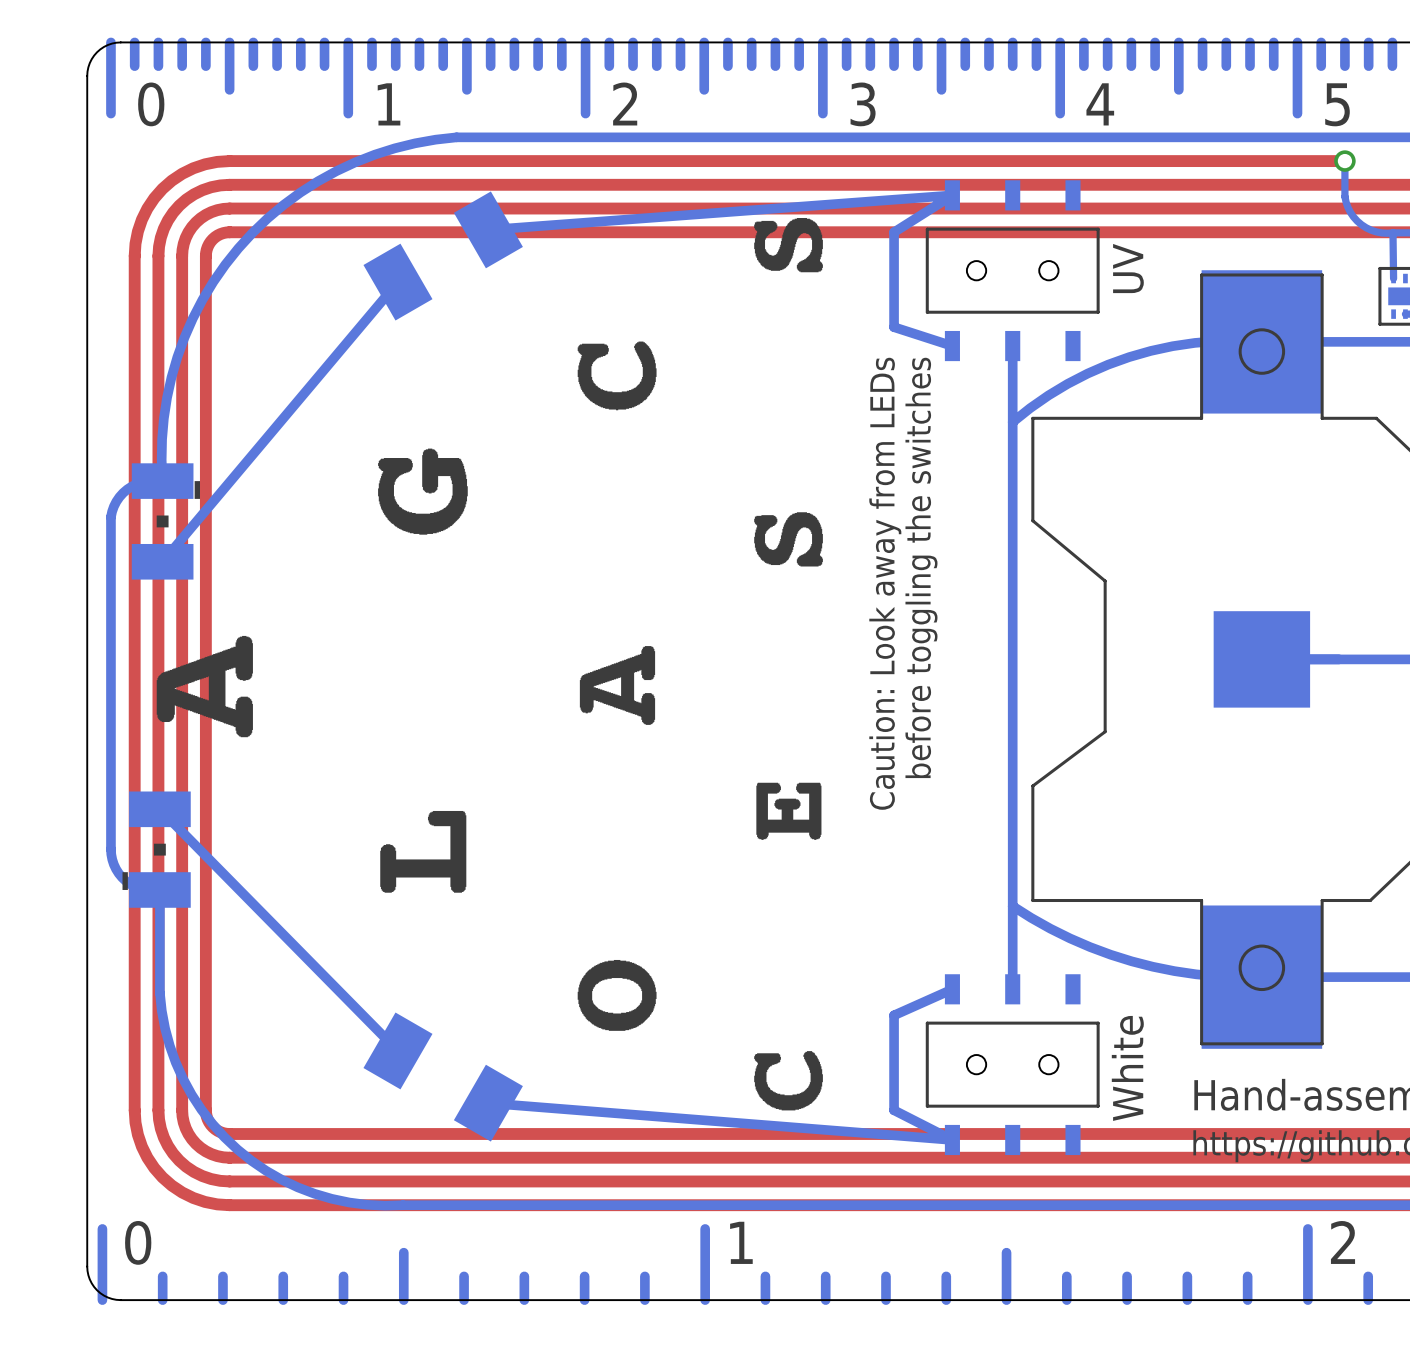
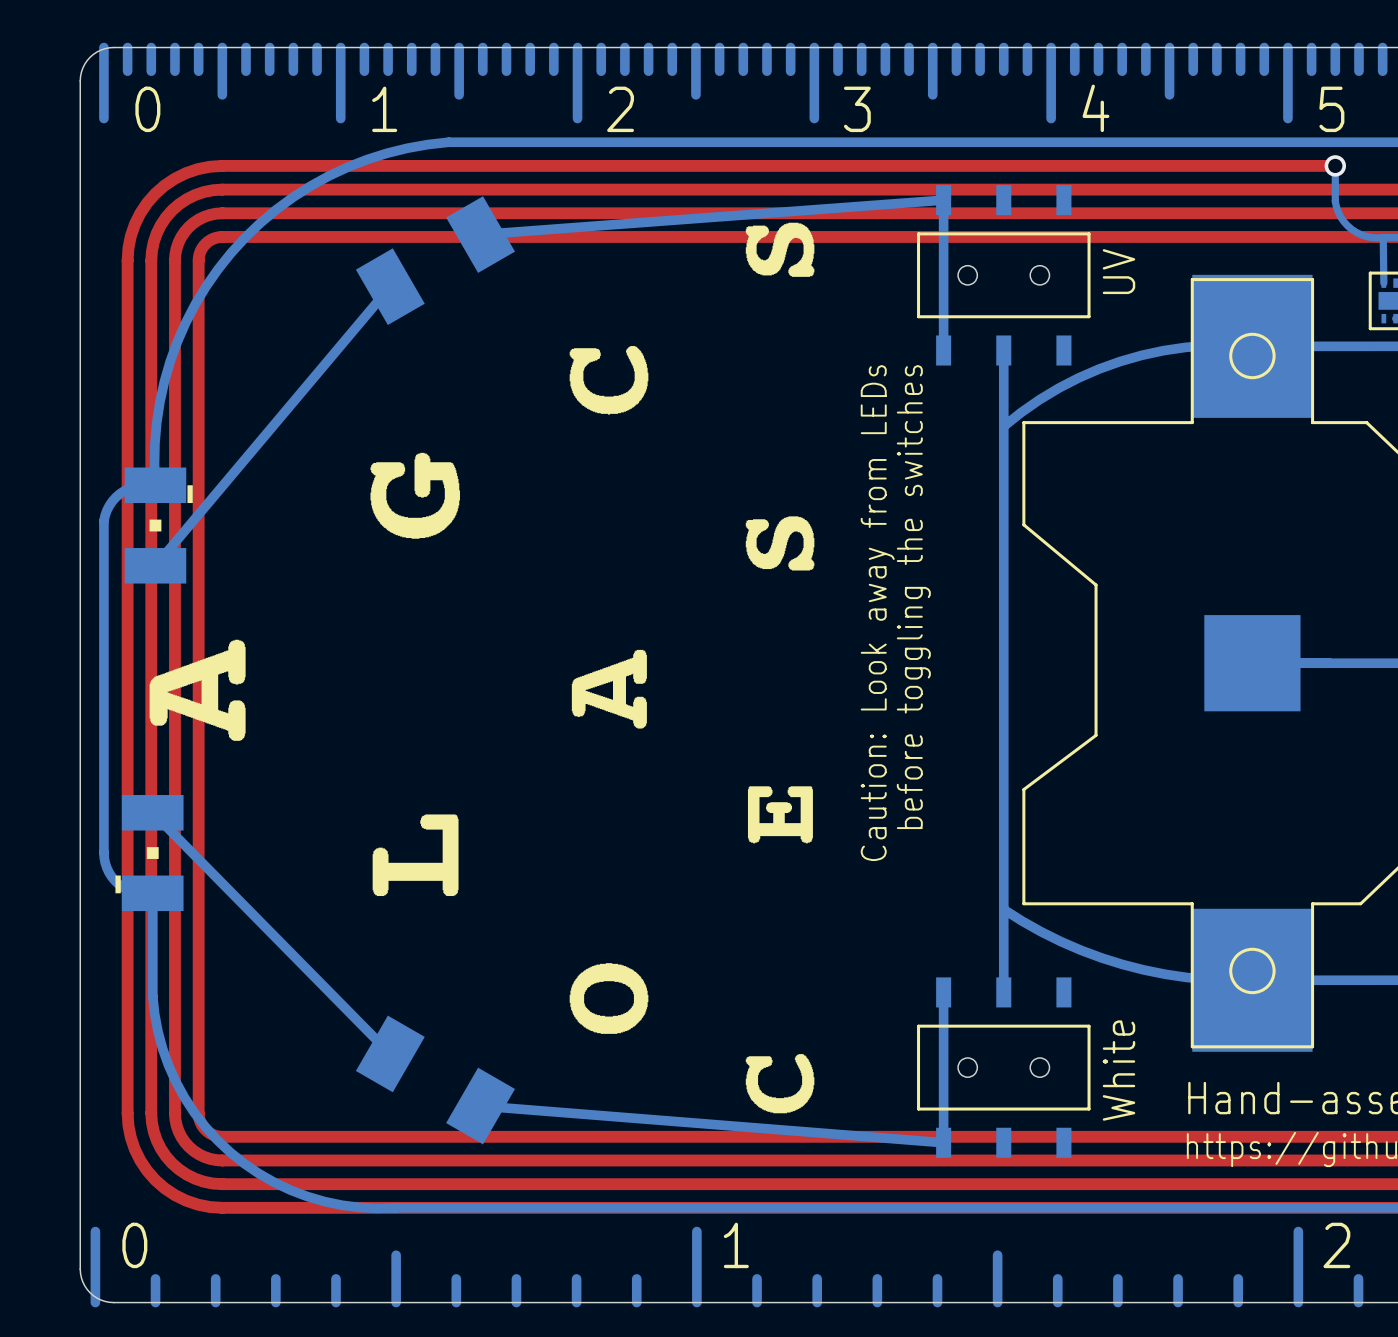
bottom track: (952, 195) (894, 232) (894, 327) (952, 346) -> (943, 200) (943, 350)
bottom track: (952, 989) (894, 1015) (894, 1110) (952, 1139) -> (943, 992) (943, 1142)

